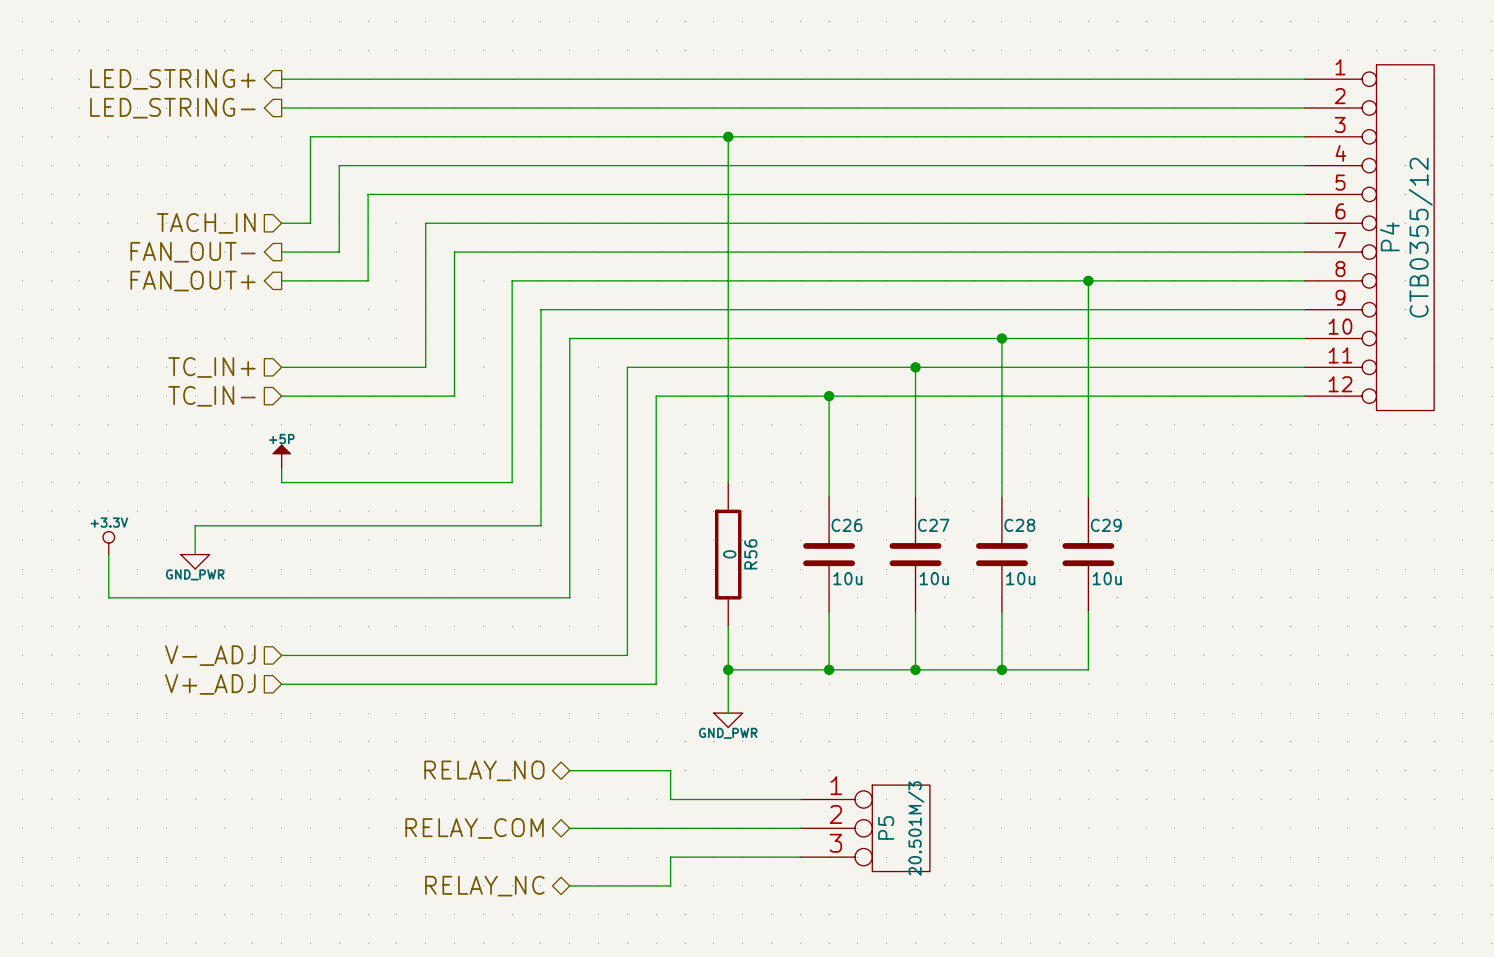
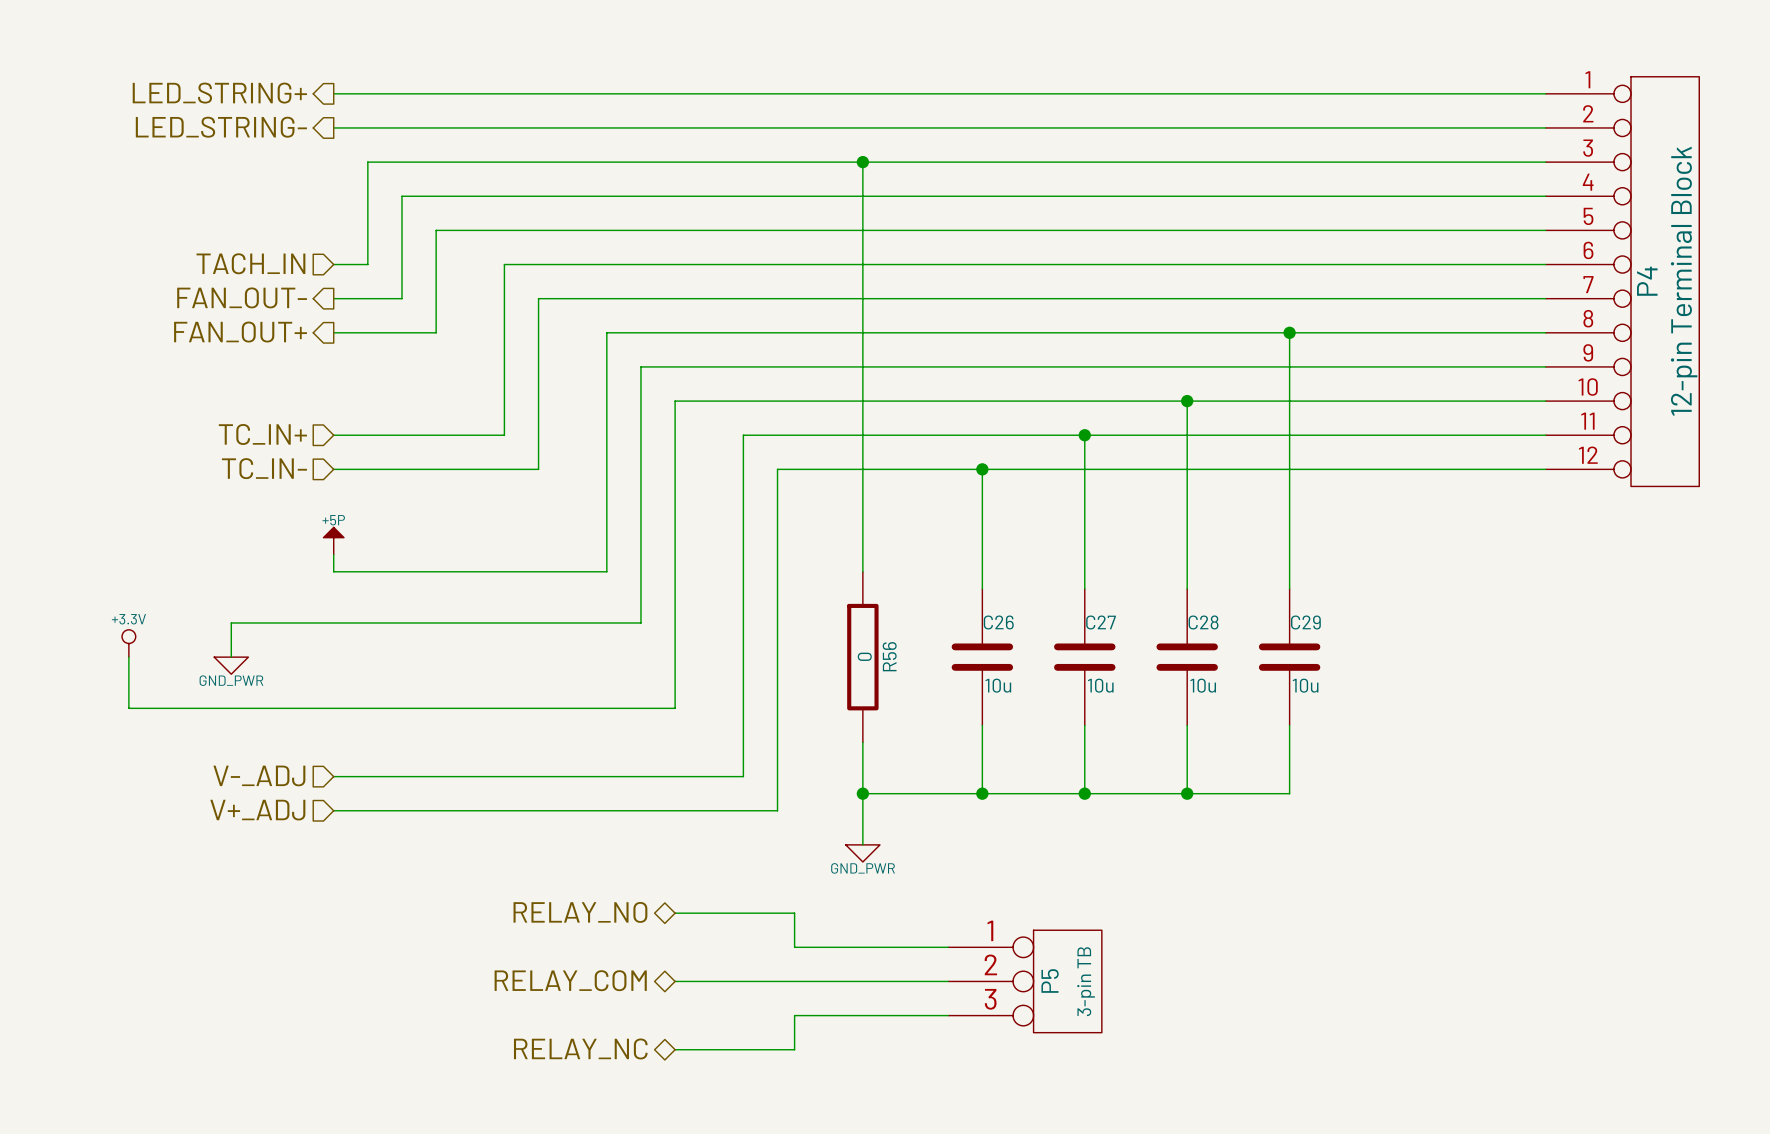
P4 value: CTB0355/12 (1420, 237) -> 12-pin Terminal Block (1684, 281)
P5 value: 20.501M/3 (916, 828) -> 3-pin TB (1086, 981)

